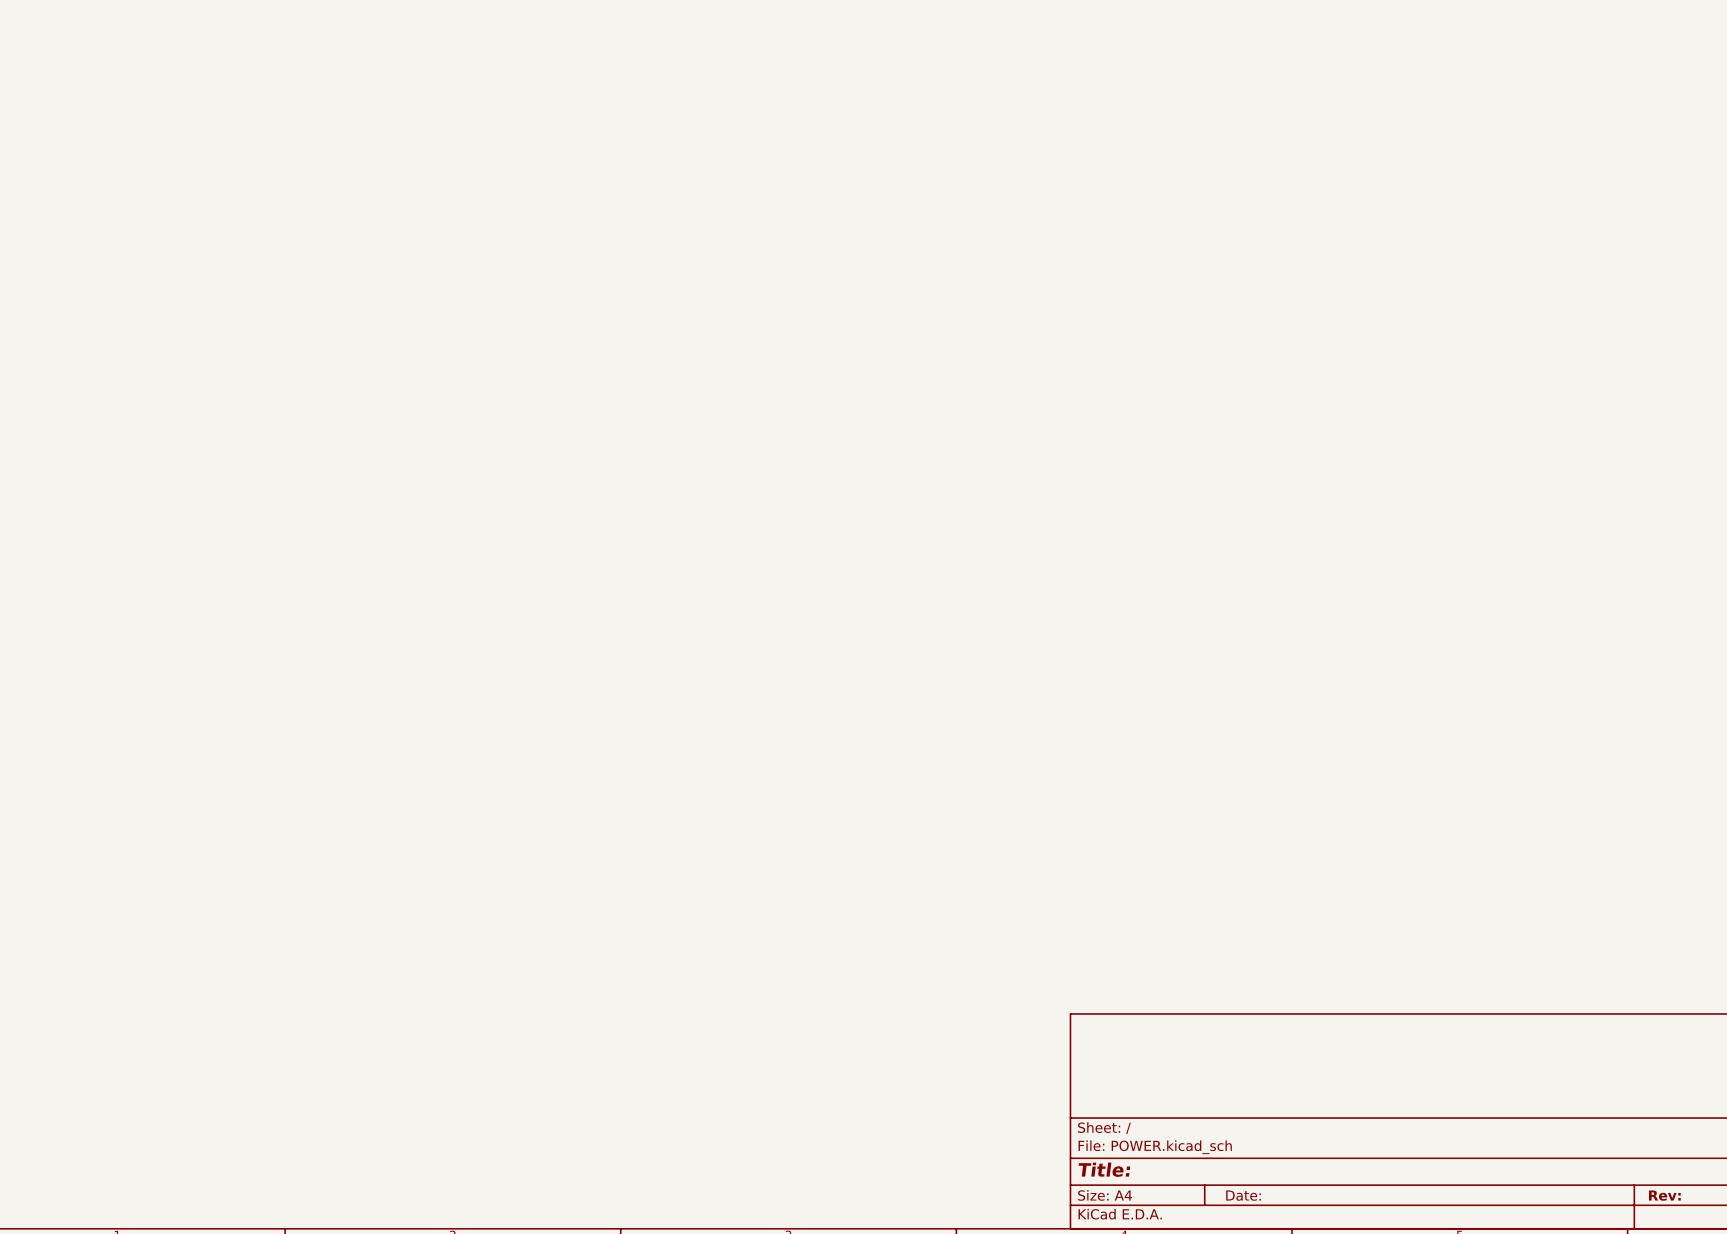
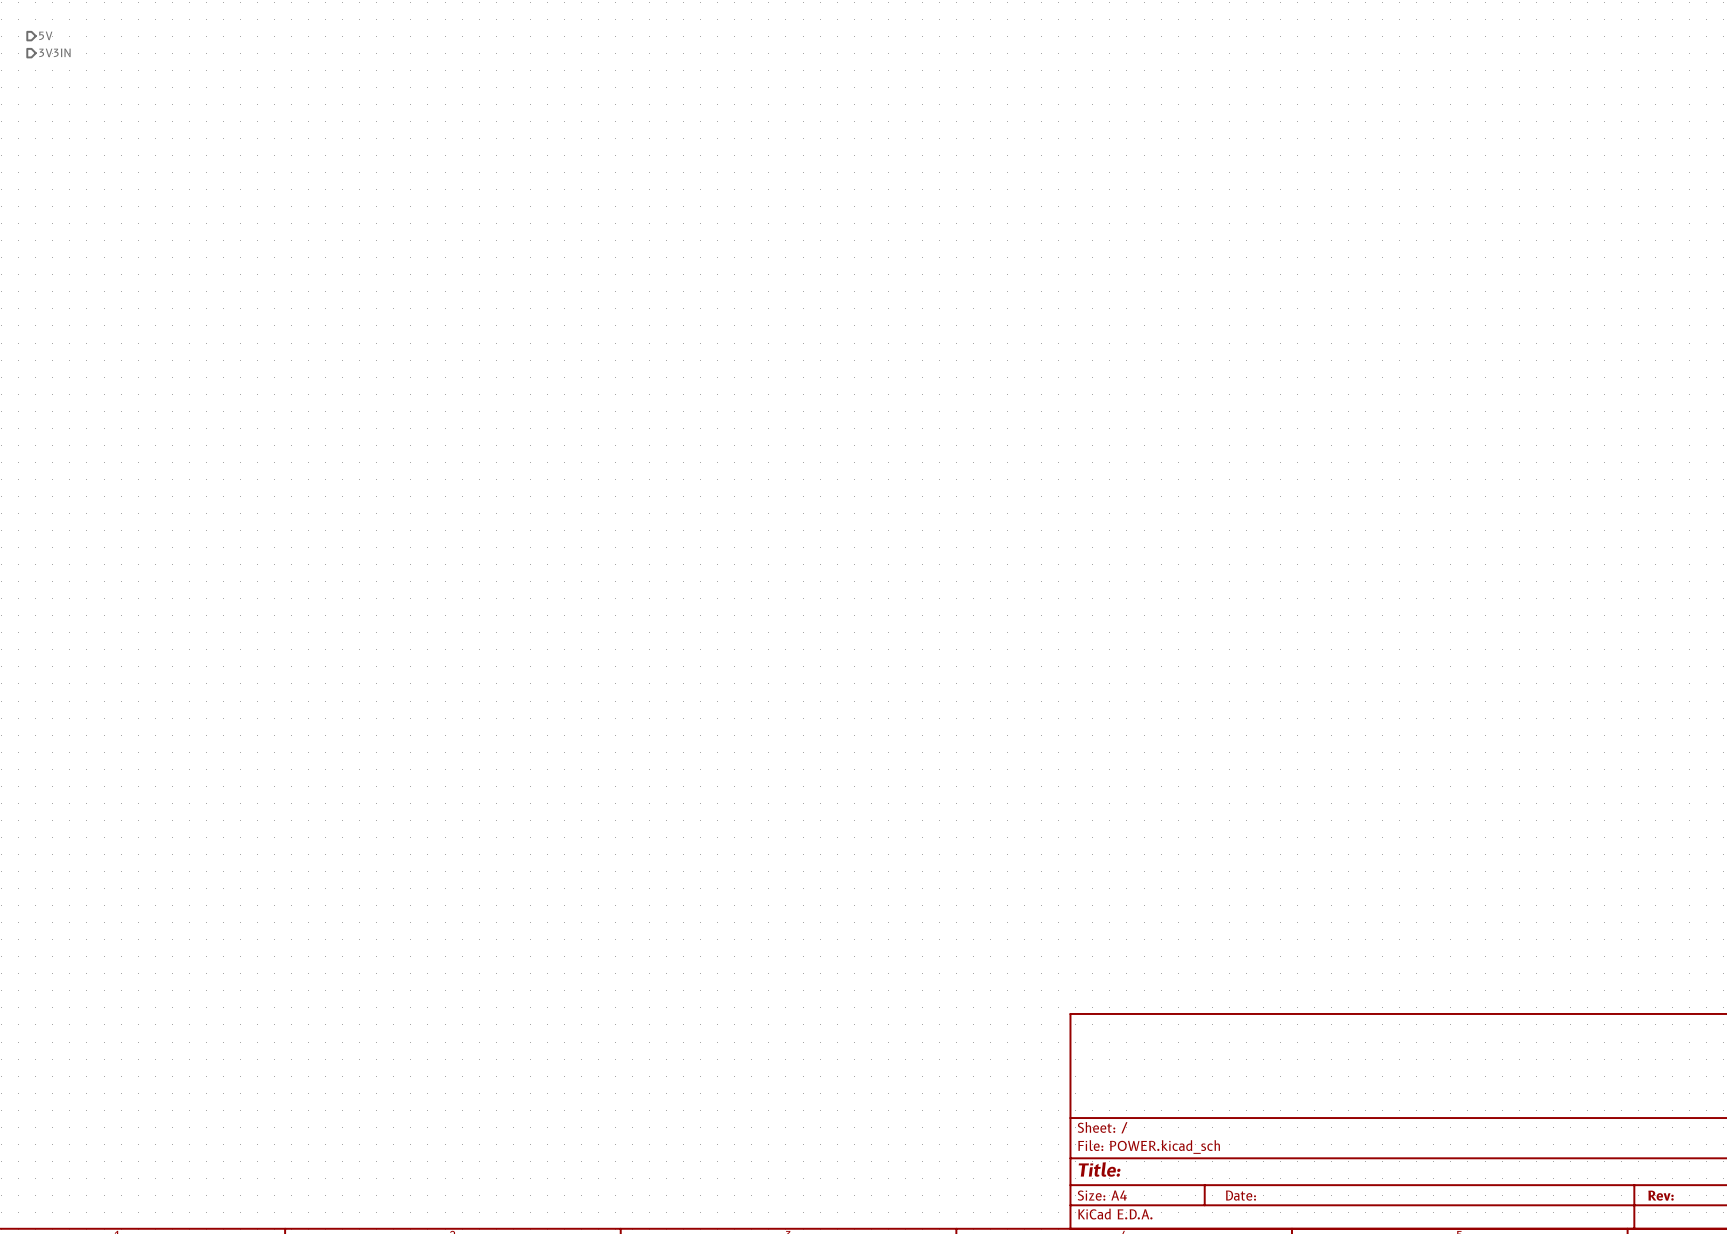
hierarchical label: none -> 5V (45, 35)
hierarchical label: none -> 3V3IN (54, 52)

